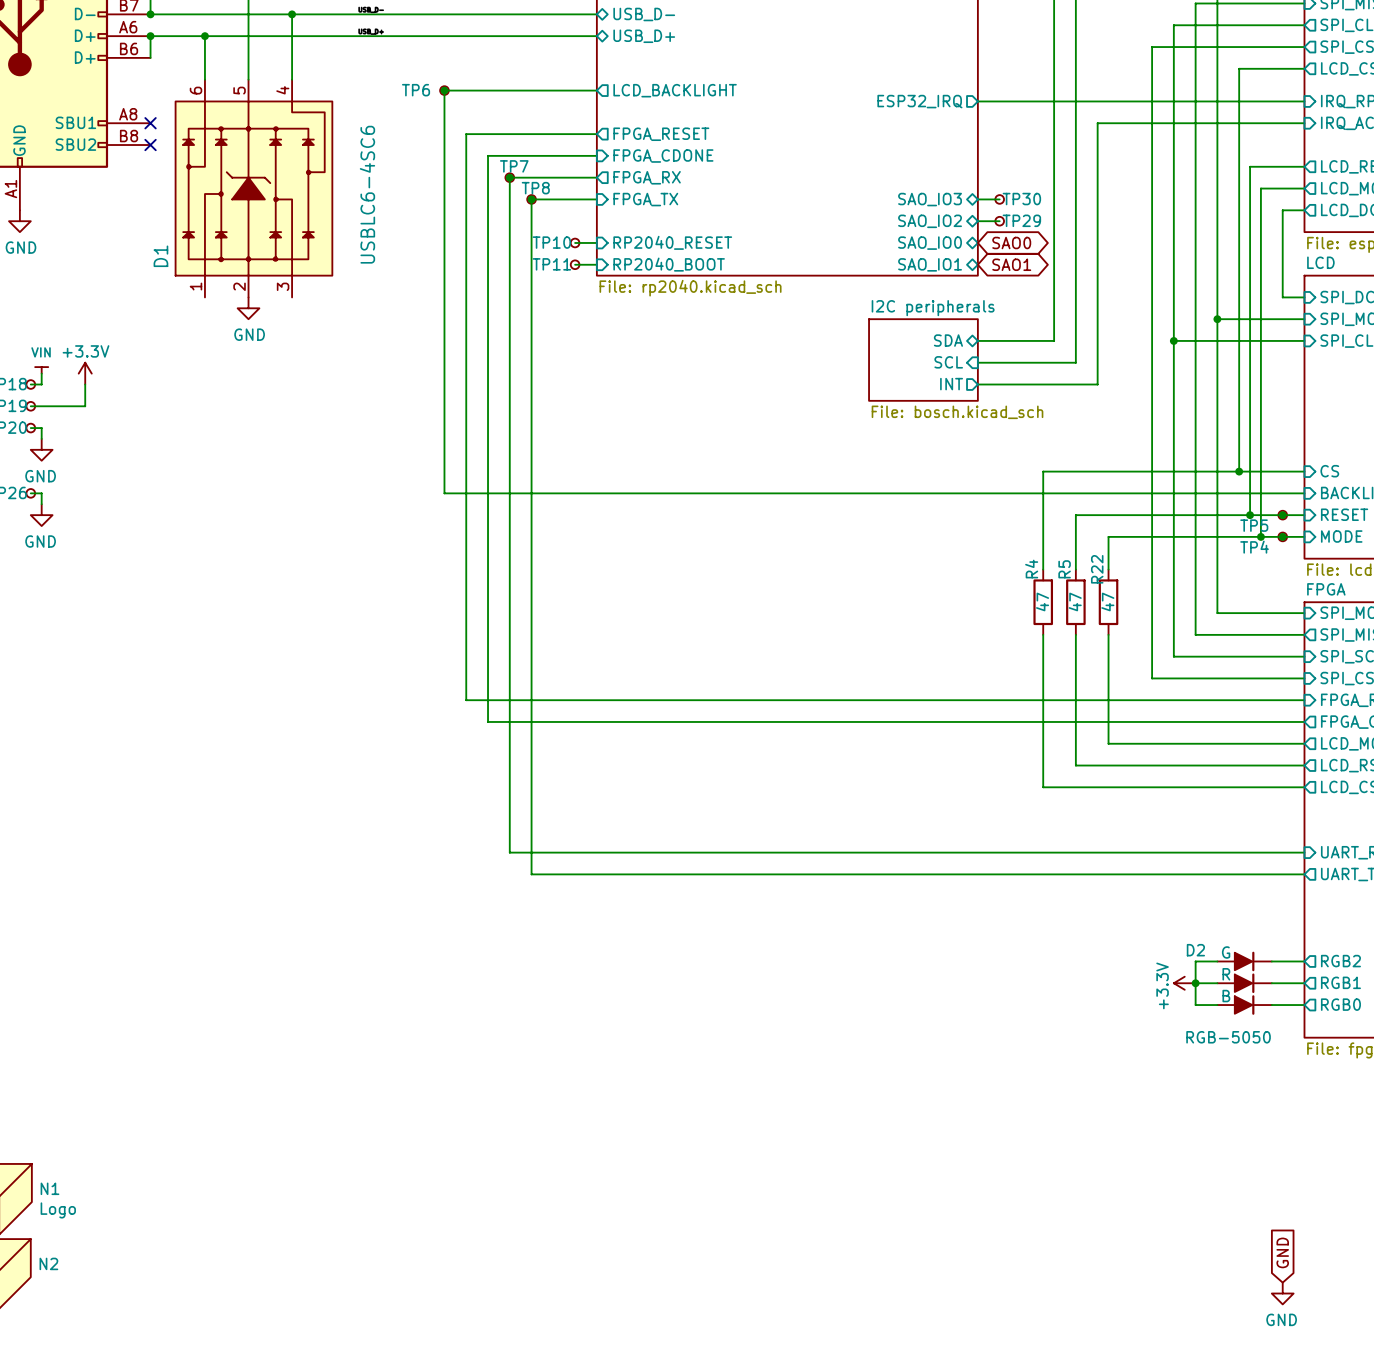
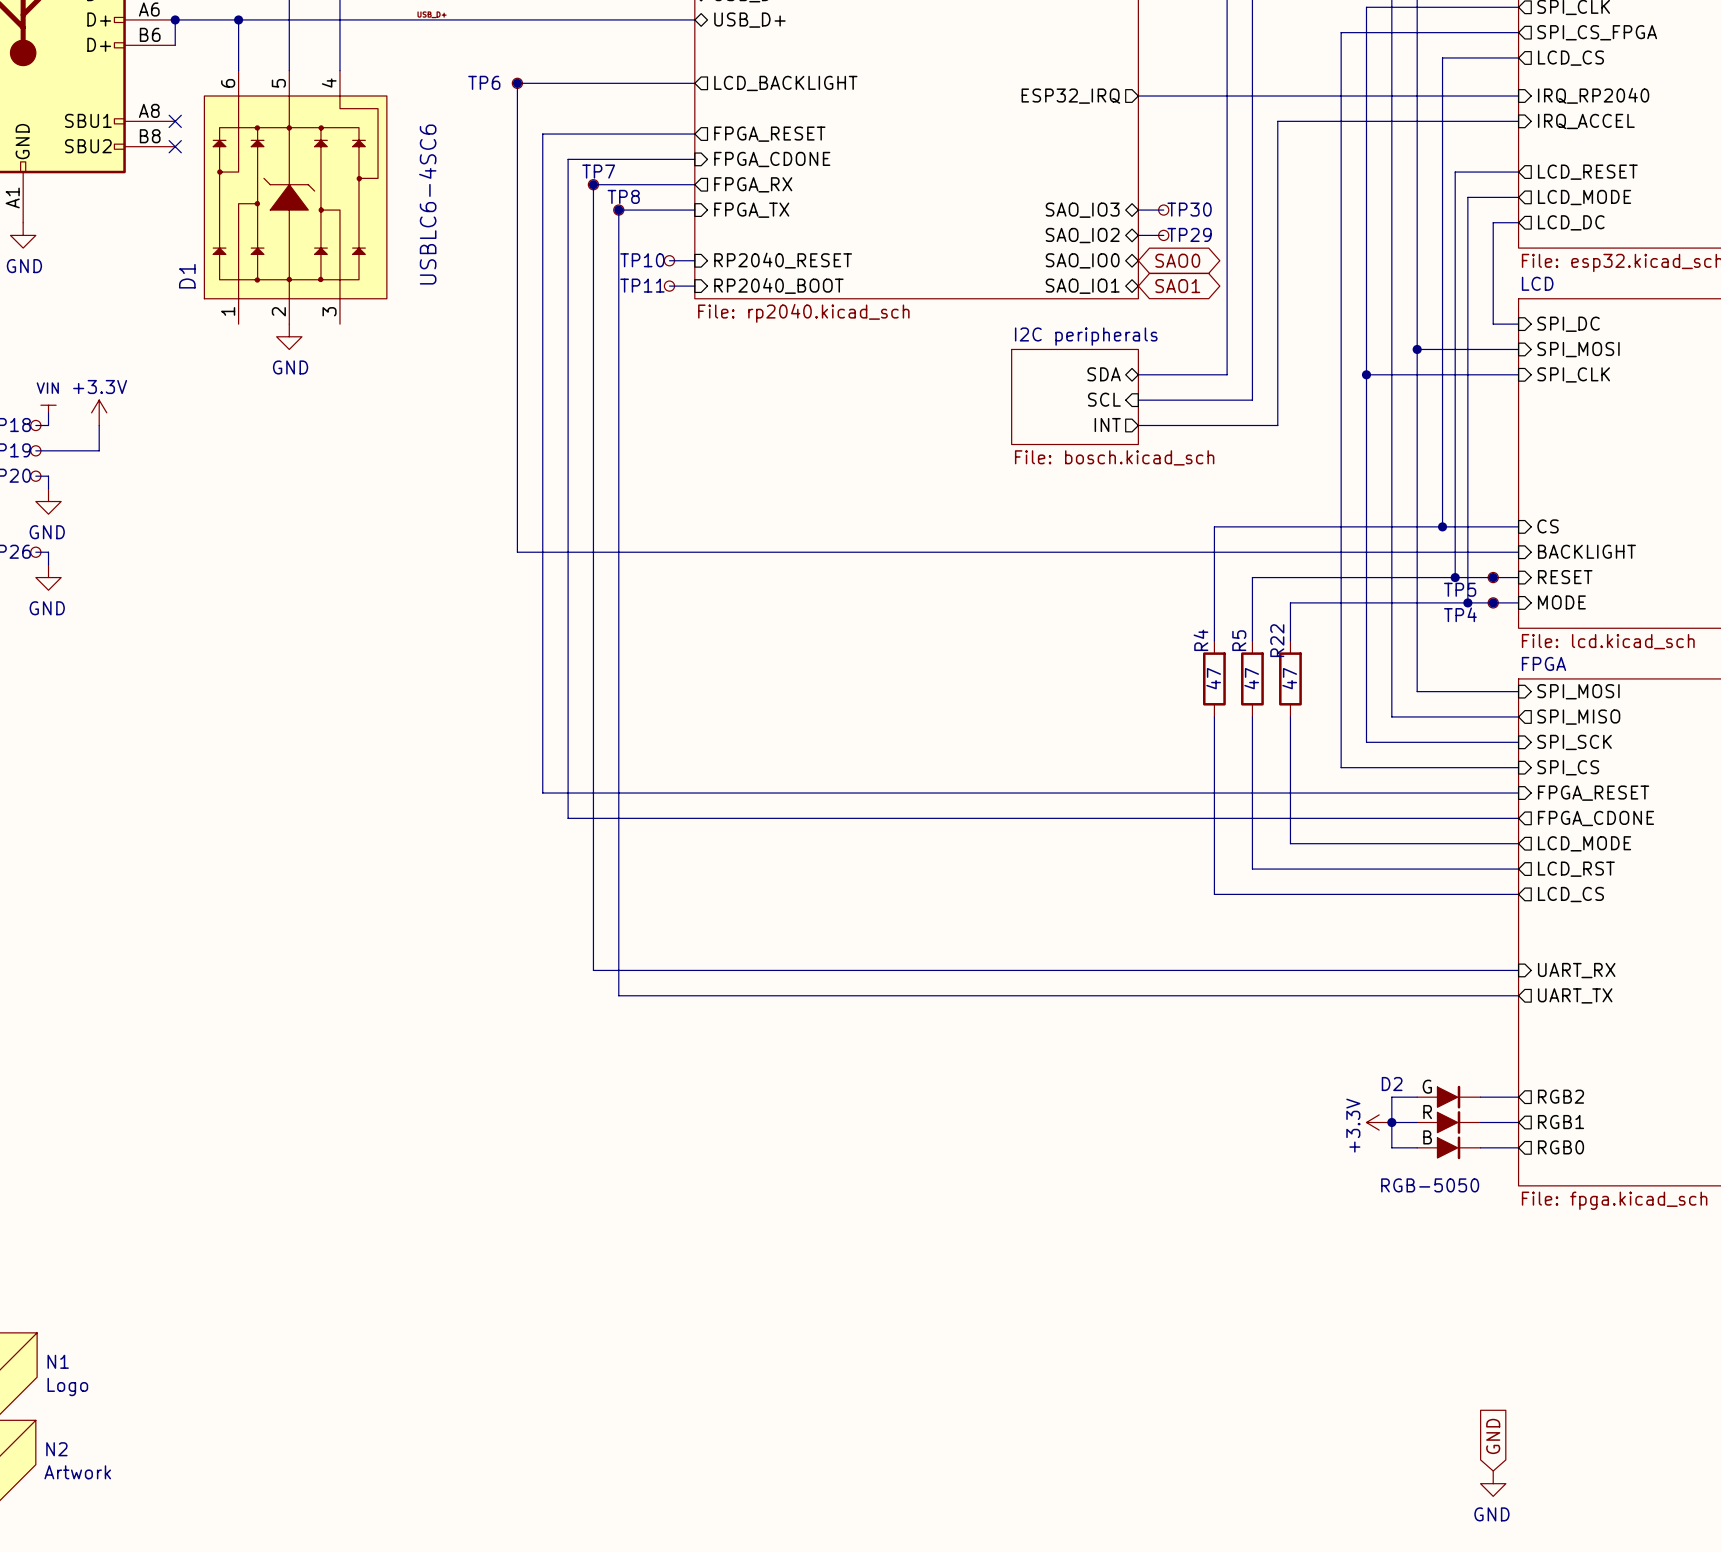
N2 value: none -> Artwork (77, 1472)

